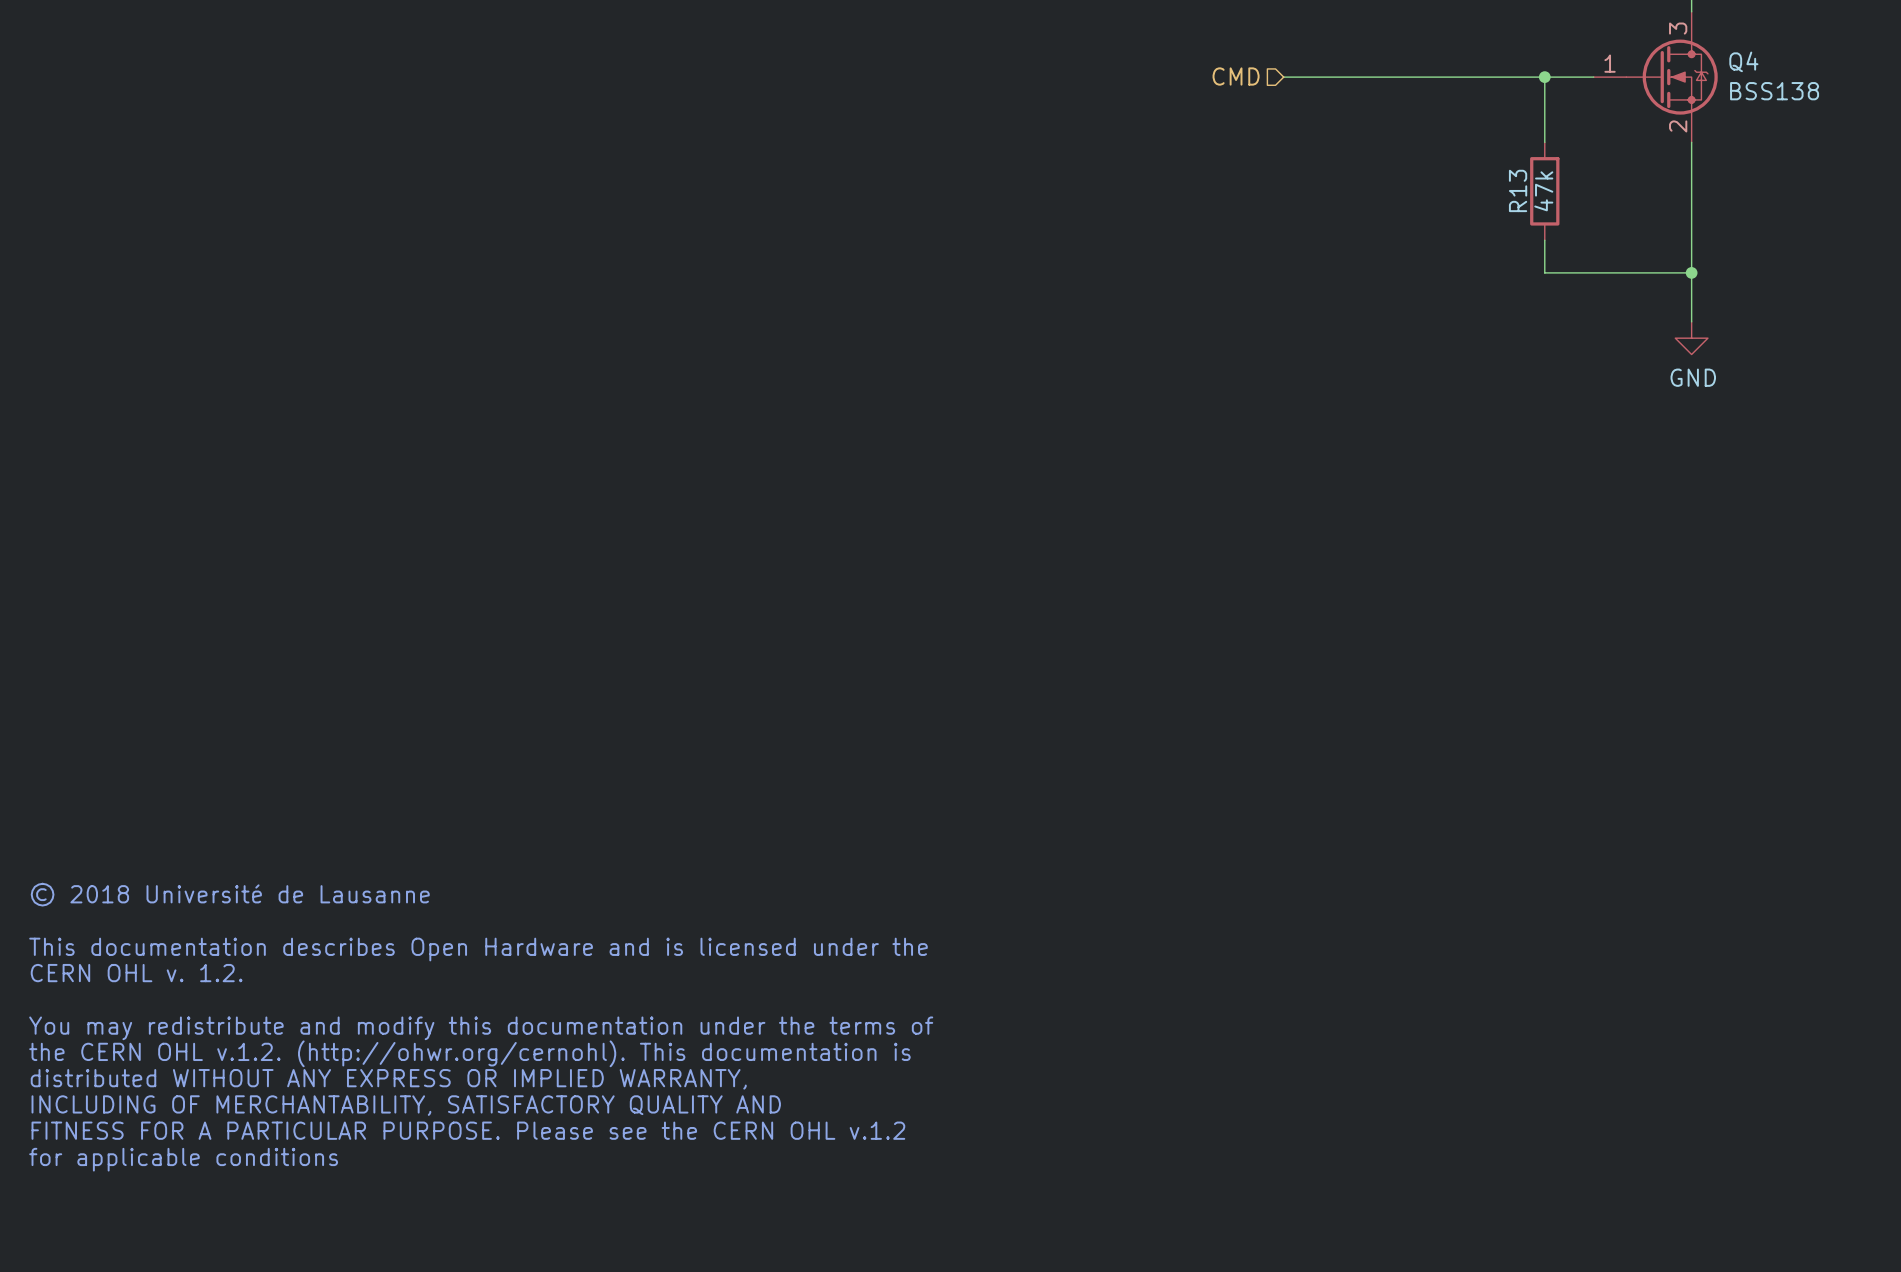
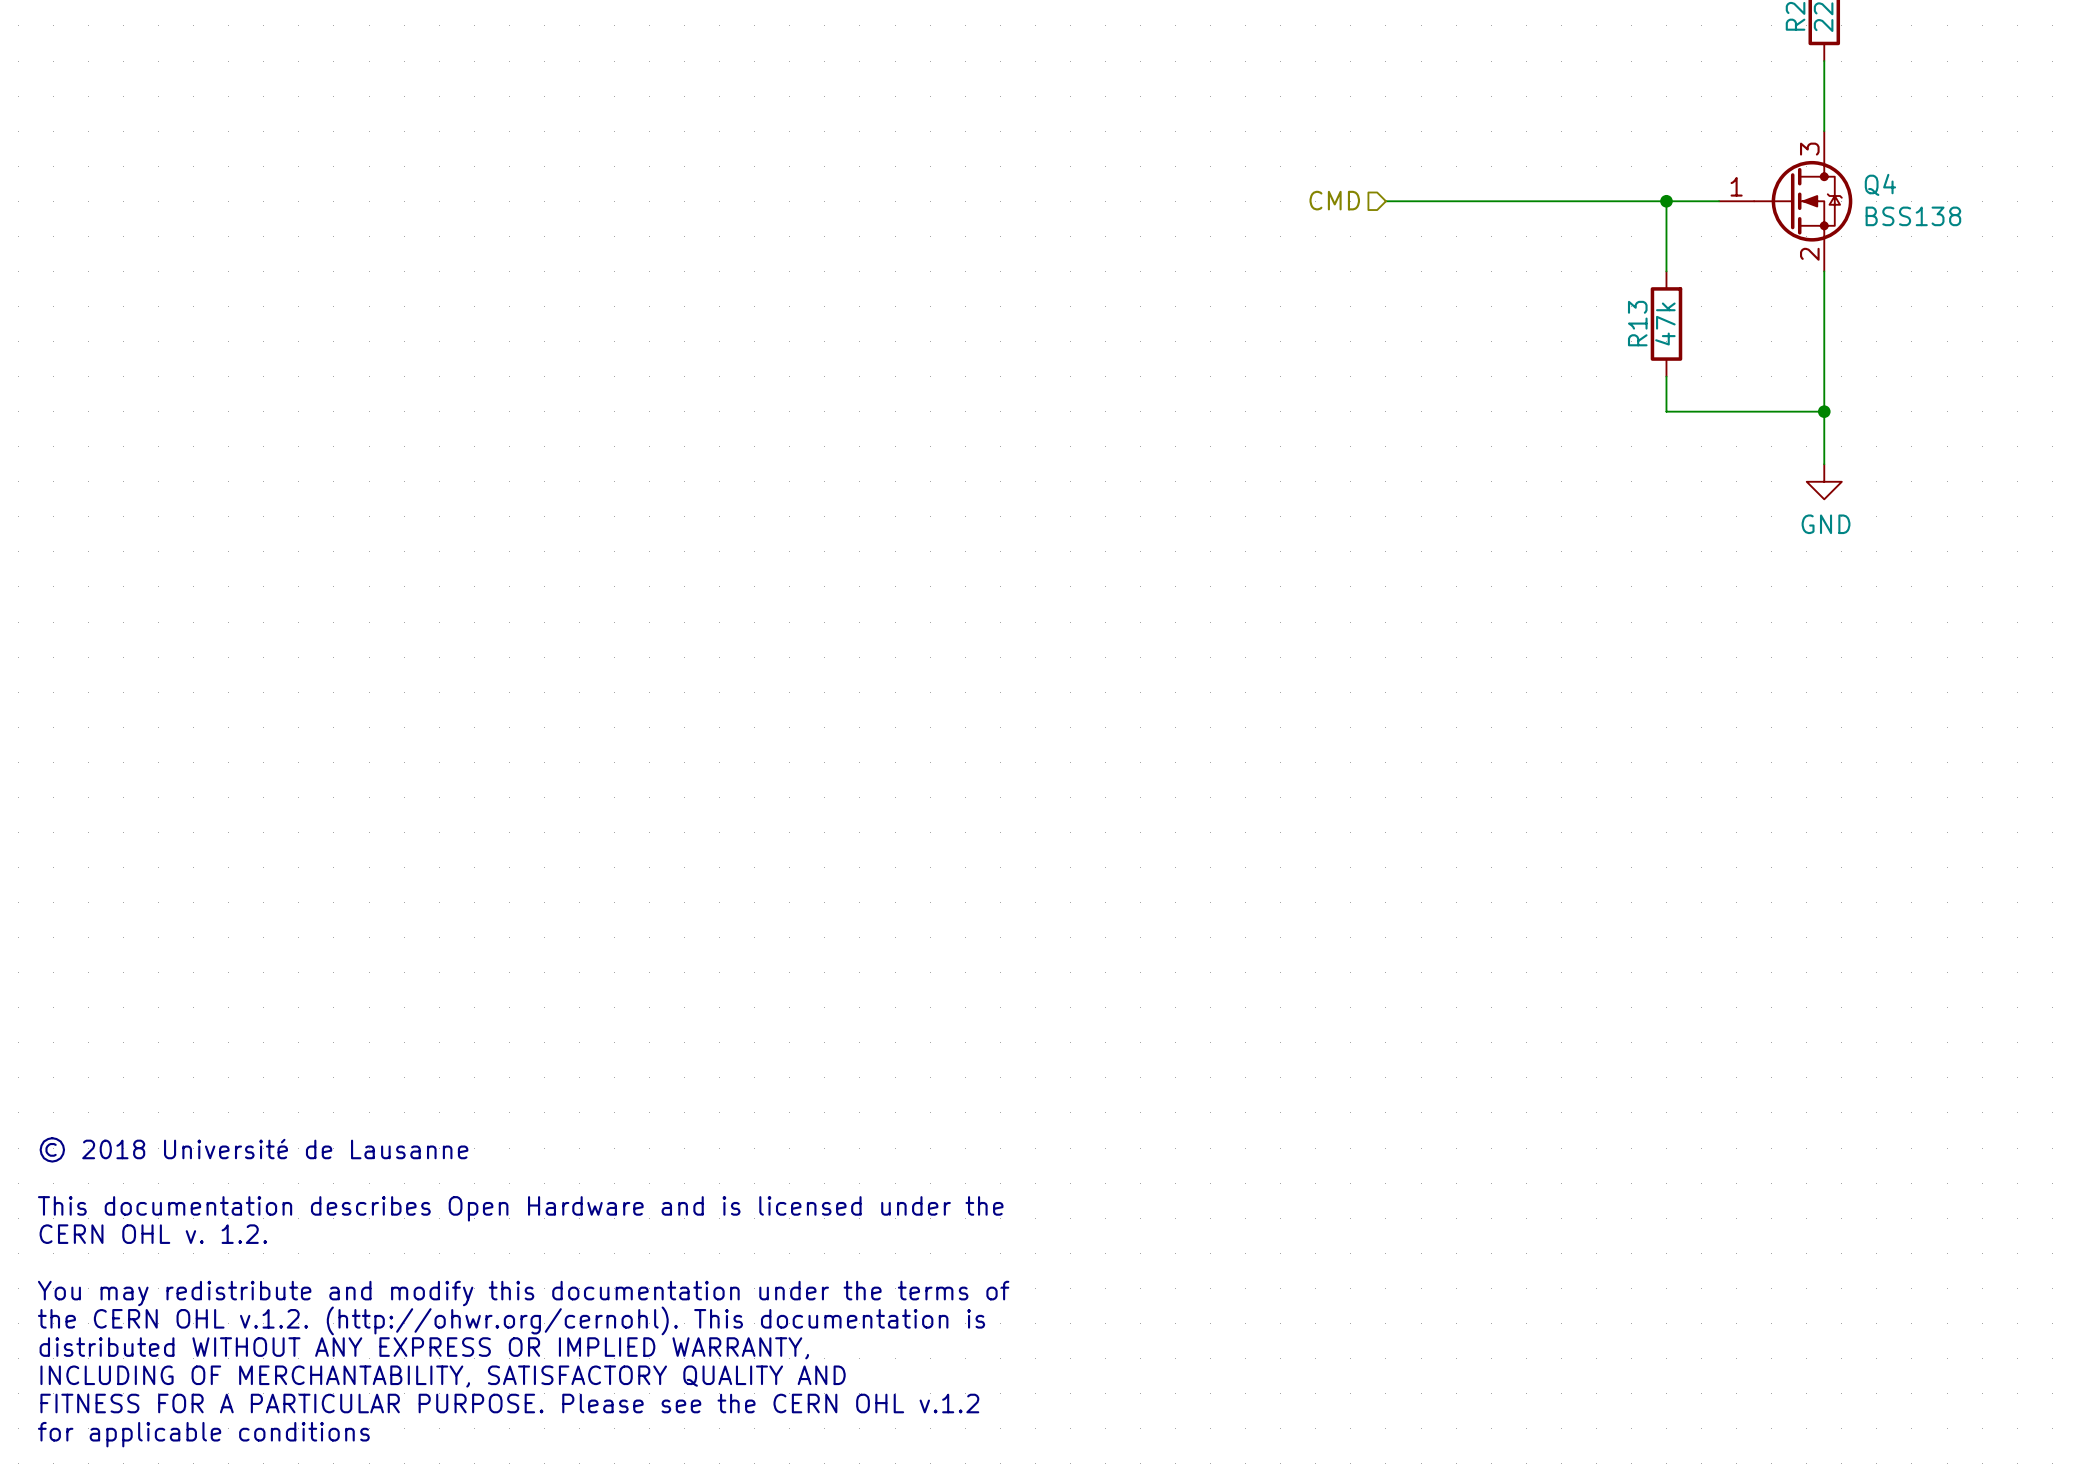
text position: © 2018 Université de Lausanne (230, 894) -> © 2018 Université de Lausanne (253, 1149)
text position: This documentation describes Open Hardware and is licensed under the (478, 949) -> This documentation describes Open Hardware and is licensed under the (520, 1208)
text position: CERN OHL v. 1.2. (136, 973) -> CERN OHL v. 1.2. (153, 1234)
text position: You may redistribute and modify this documentation under the terms of (481, 1028) -> You may redistribute and modify this documentation under the terms of (523, 1293)
text position: the CERN OHL v.1.2. (http://ohwr.org/cernohl). This documentation is (469, 1053) -> the CERN OHL v.1.2. (http://ohwr.org/cernohl). This documentation is (511, 1320)
text position: distributed WITHOUT ANY EXPRESS OR IMPLIED WARRANTY, (388, 1079) -> distributed WITHOUT ANY EXPRESS OR IMPLIED WARRANTY, (424, 1348)
text position: INCLUDING OF MERCHANTABILITY, SATISFACTORY QUALITY AND (406, 1105) -> INCLUDING OF MERCHANTABILITY, SATISFACTORY QUALITY AND (443, 1376)
text position: FITNESS FOR A PARTICULAR PURPOSE. Please see the CERN OHL v.1.2 (468, 1130) -> FITNESS FOR A PARTICULAR PURPOSE. Please see the CERN OHL v.1.2 (509, 1403)
text position: for applicable conditions (183, 1159) -> for applicable conditions (203, 1434)

